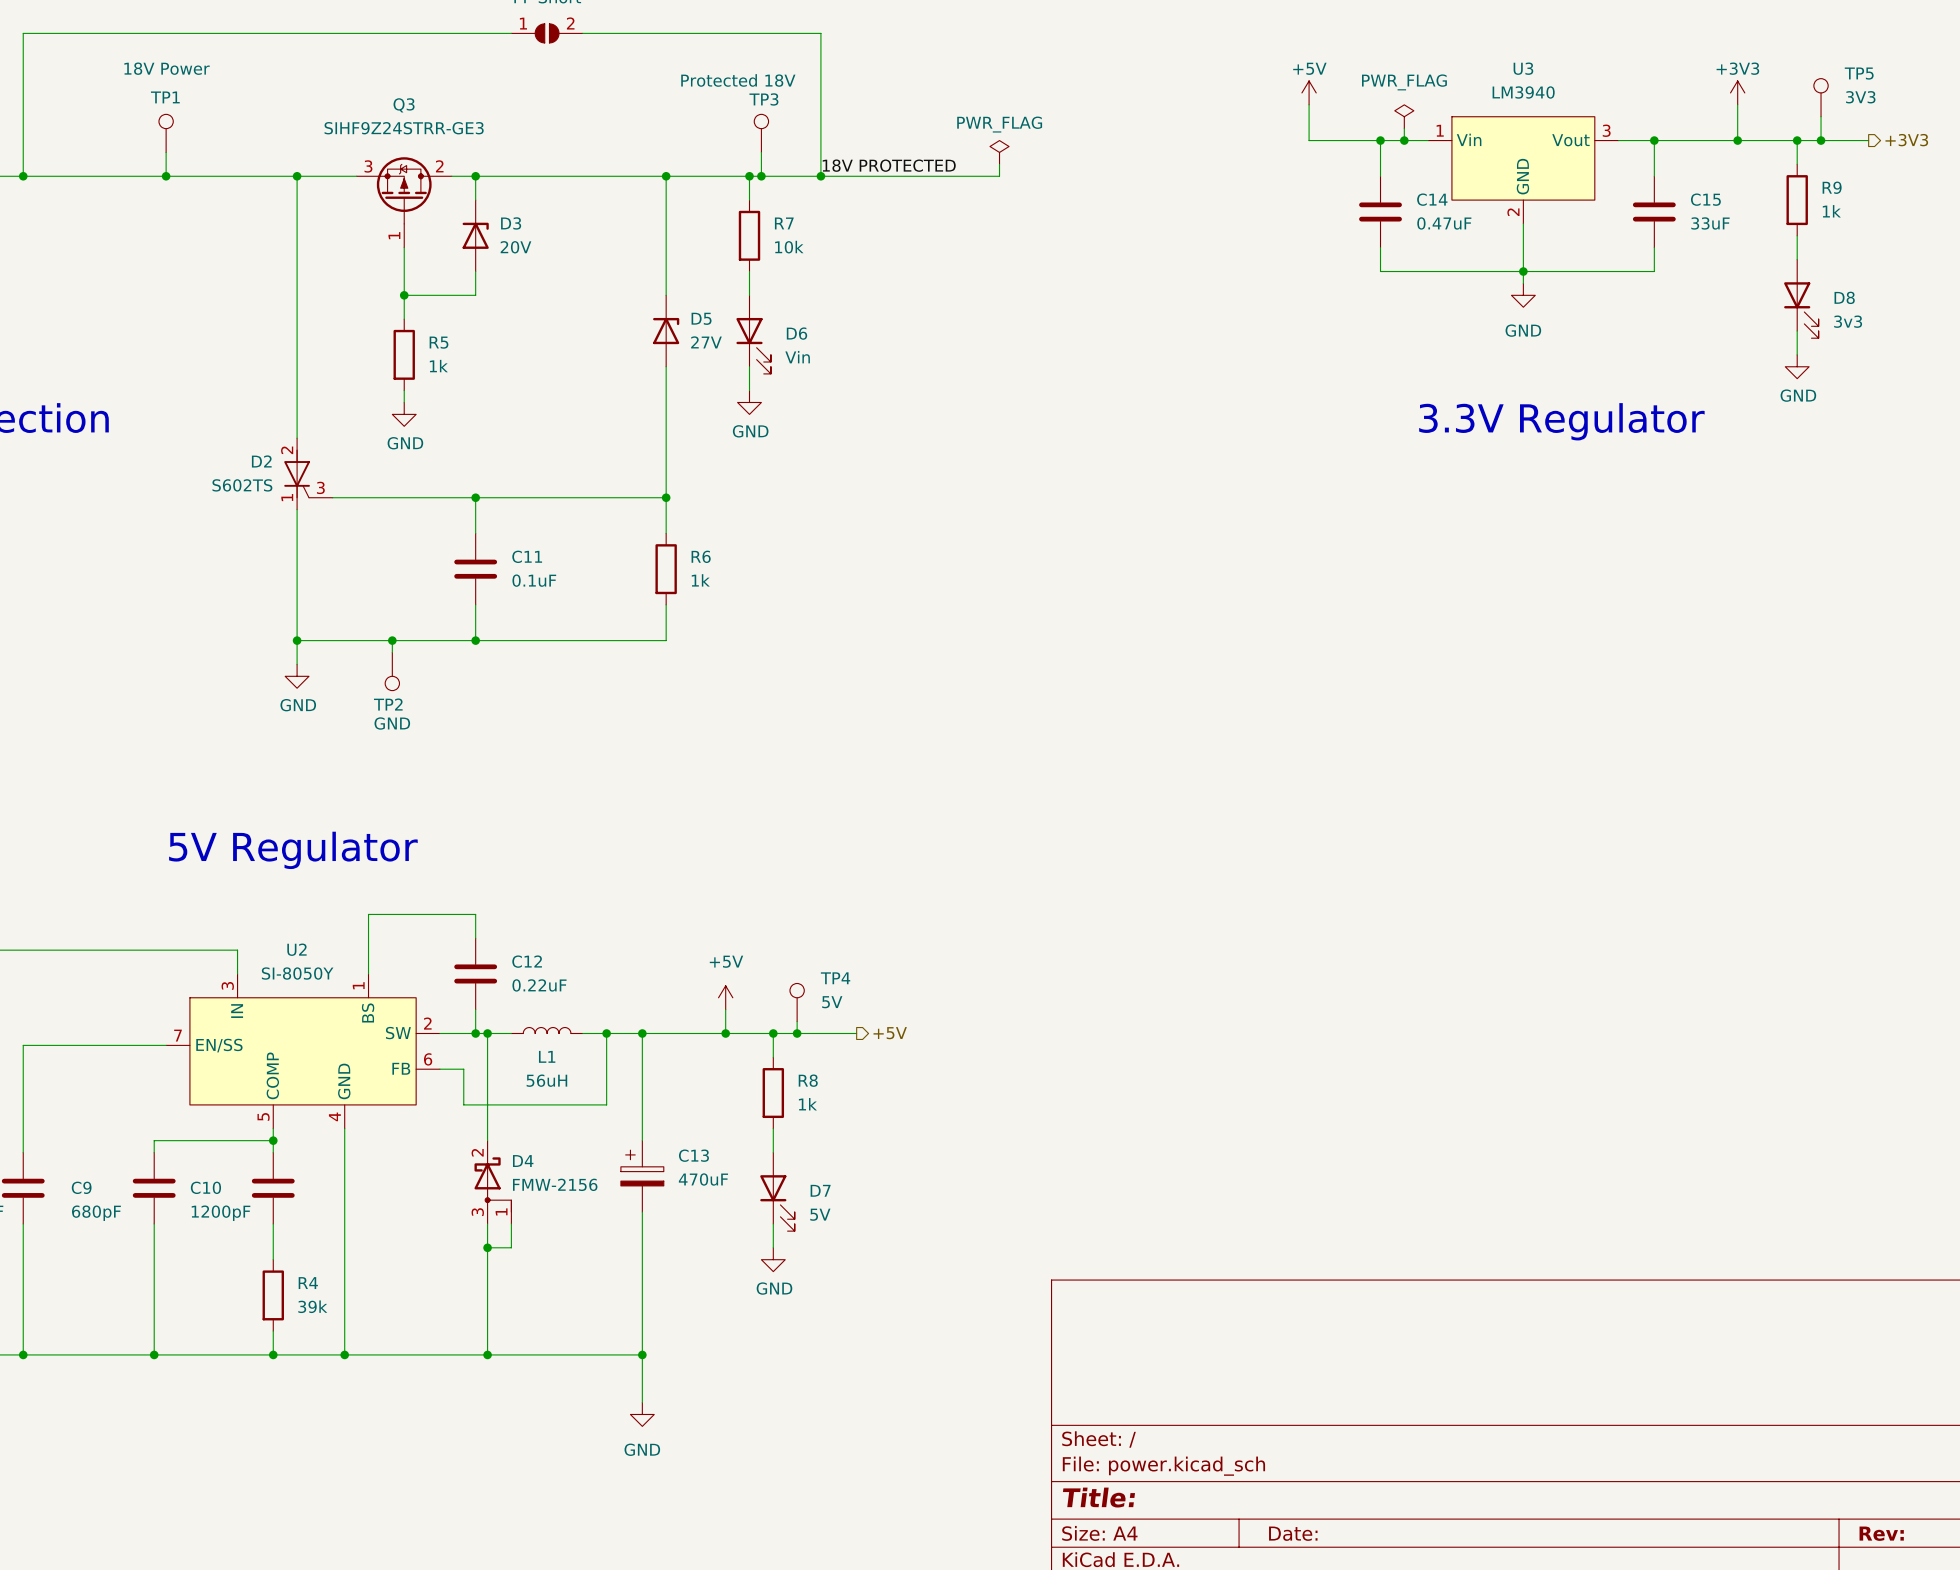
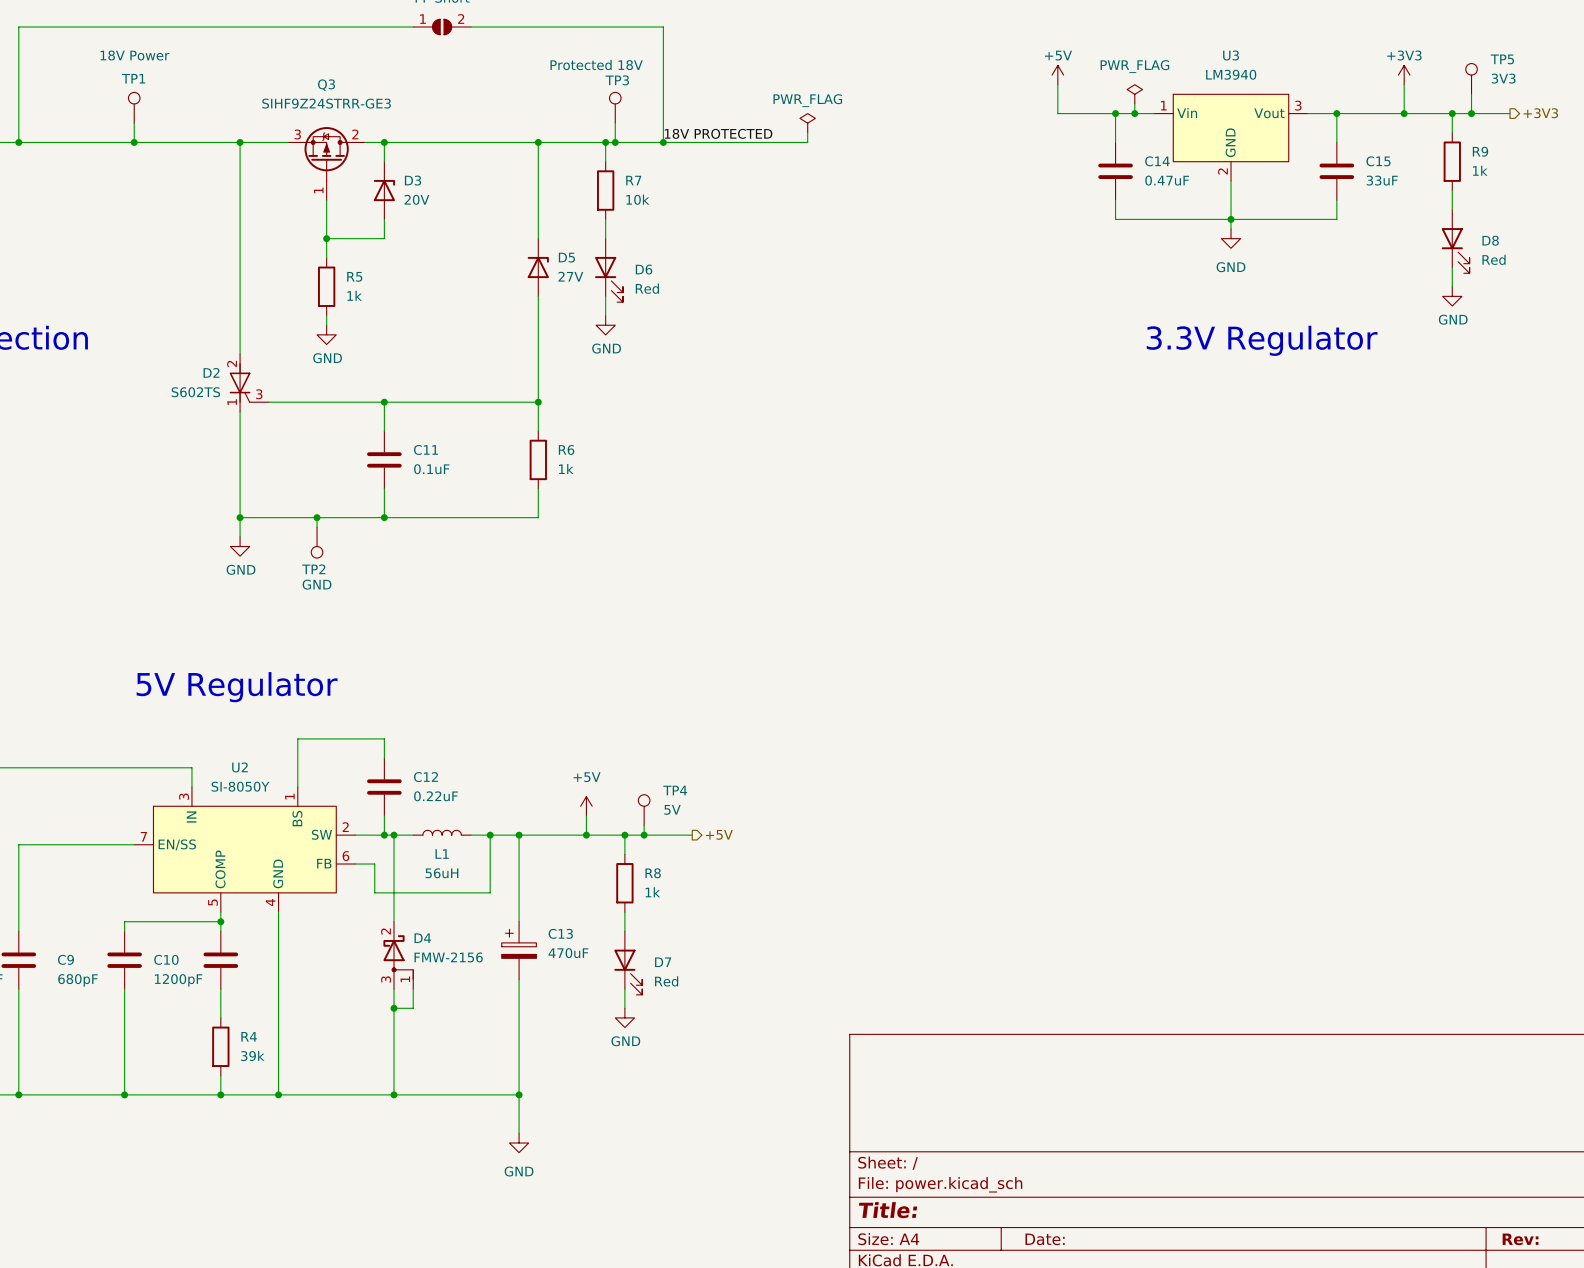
D8 value: 3v3 (1848, 321) -> Red (1494, 259)
D6 value: Vin (797, 357) -> Red (647, 288)
D7 value: 5V (820, 1214) -> Red (666, 981)

